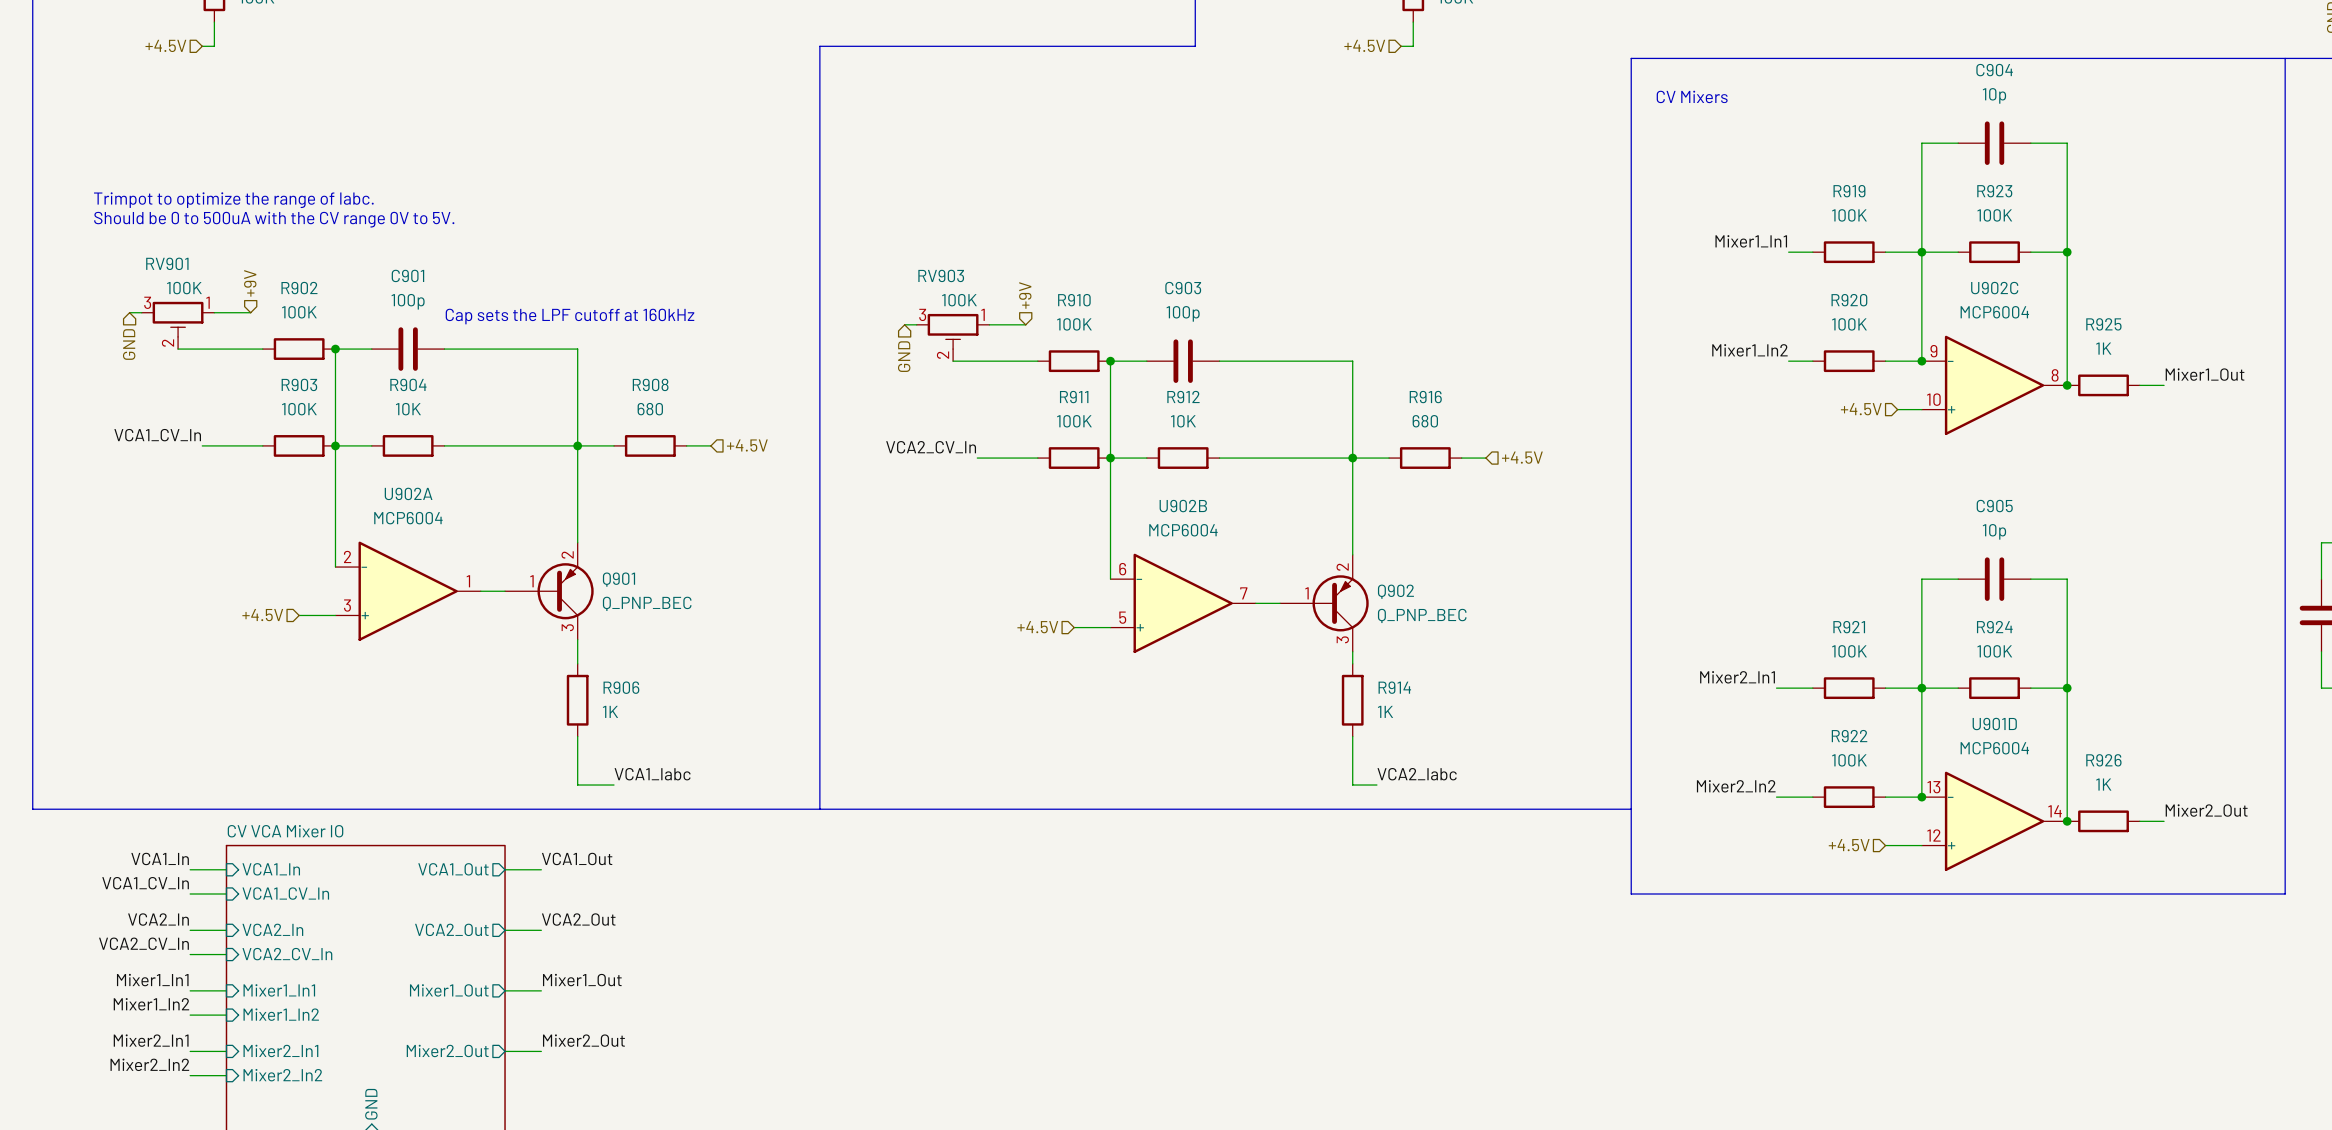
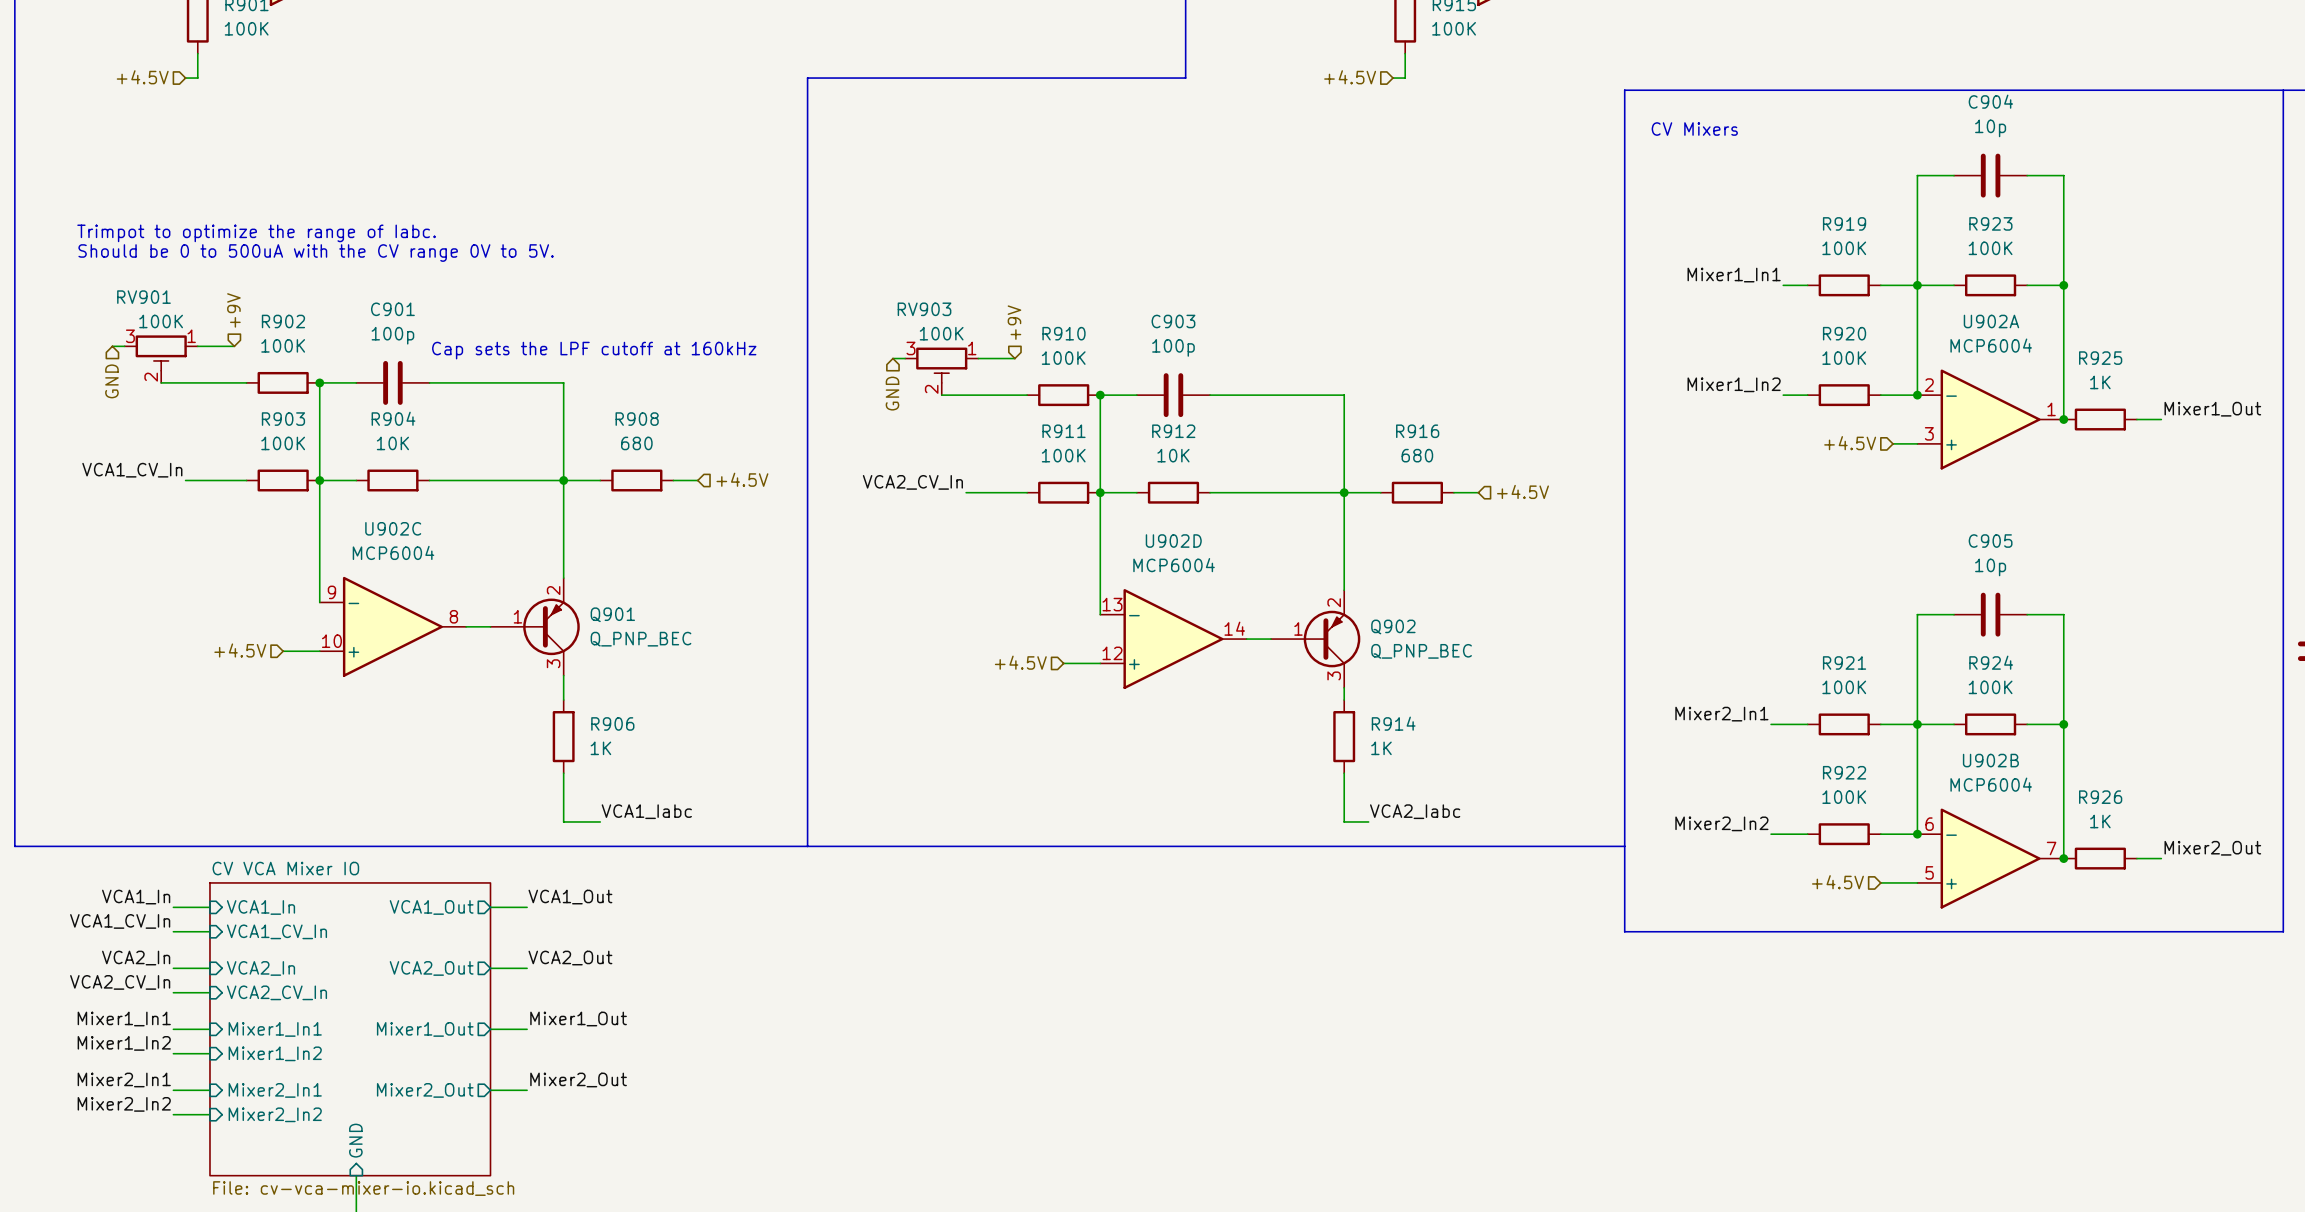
U902C position: (1994, 385) -> (392, 626)
U902A position: (408, 591) -> (1990, 419)
U902B position: (1183, 603) -> (1990, 858)
U902D: none -> MCP6004 (1173, 639)
U901D: MCP6004 (1994, 821) -> none

